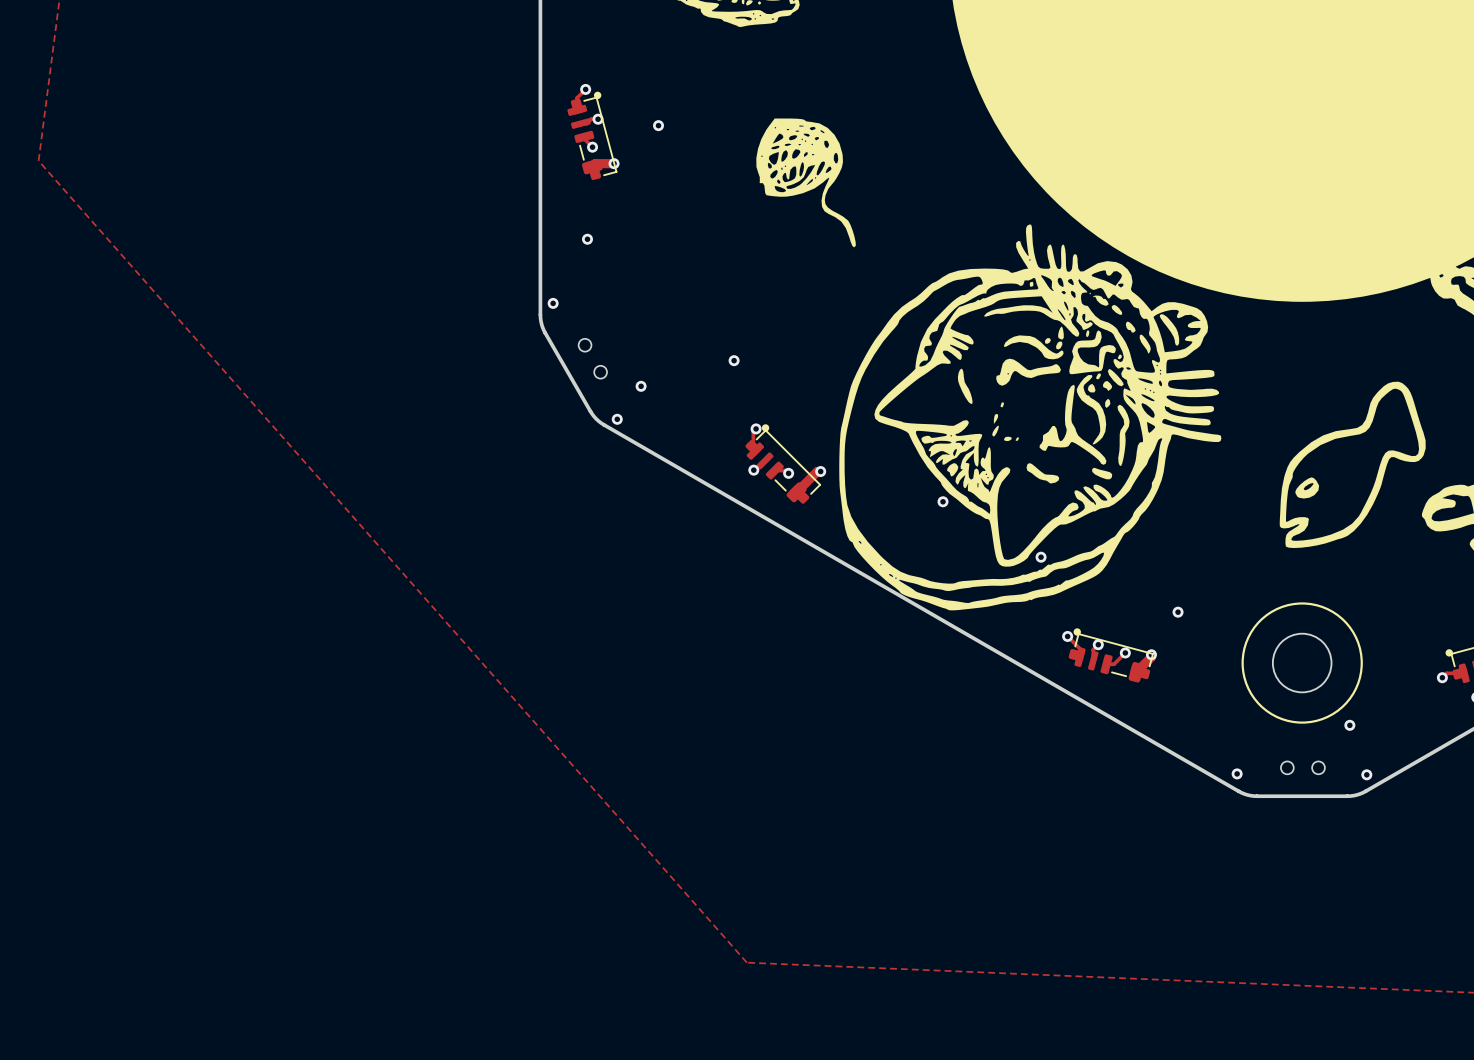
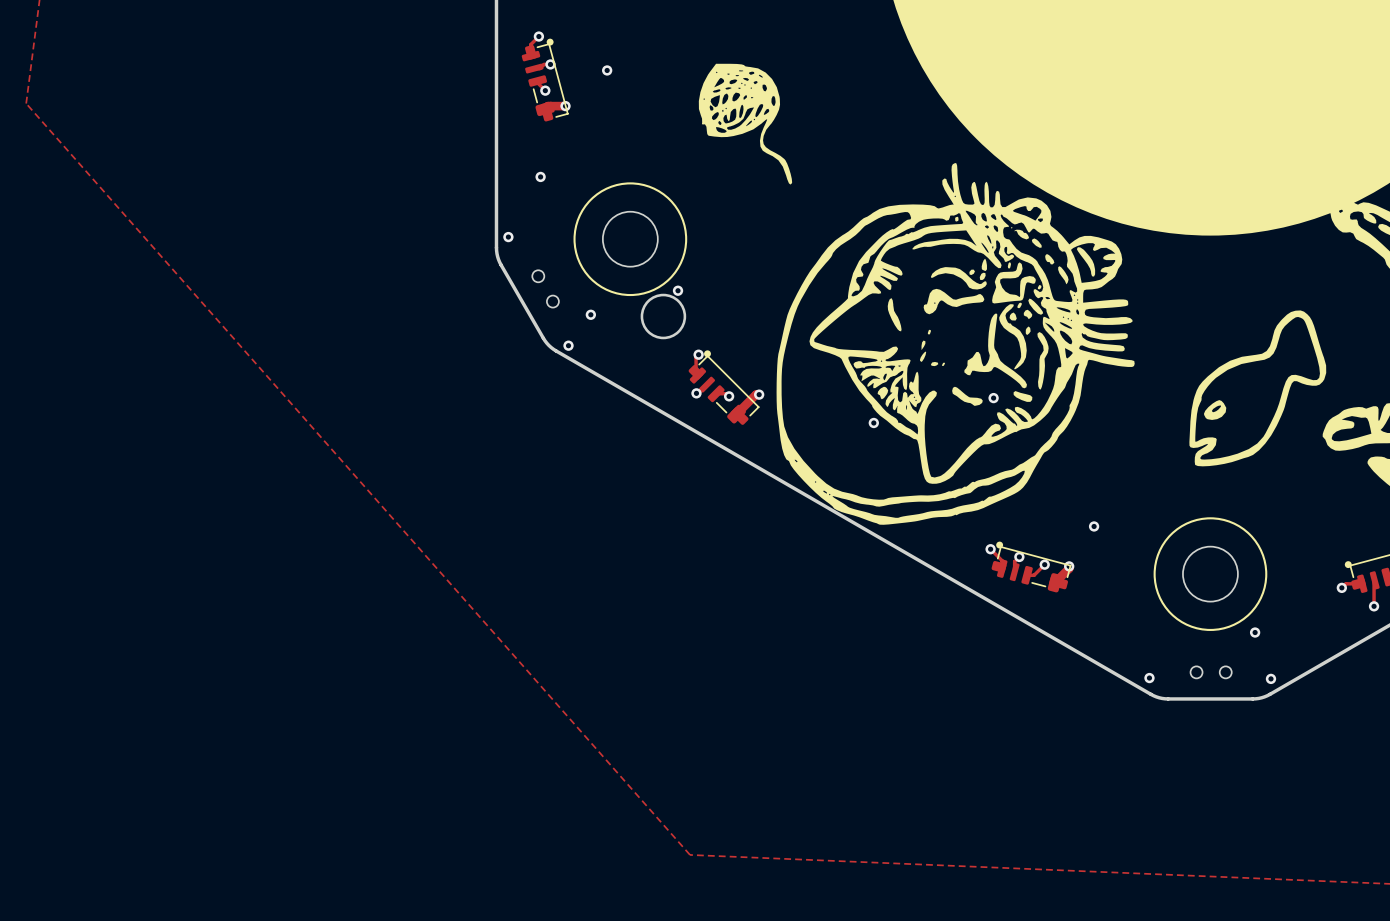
drawing: none -> [573, 182, 688, 297]
round board edge: none -> [602, 210, 659, 268]
round board edge: none -> [640, 293, 687, 340]
via position: (1041, 557) -> (993, 398)

